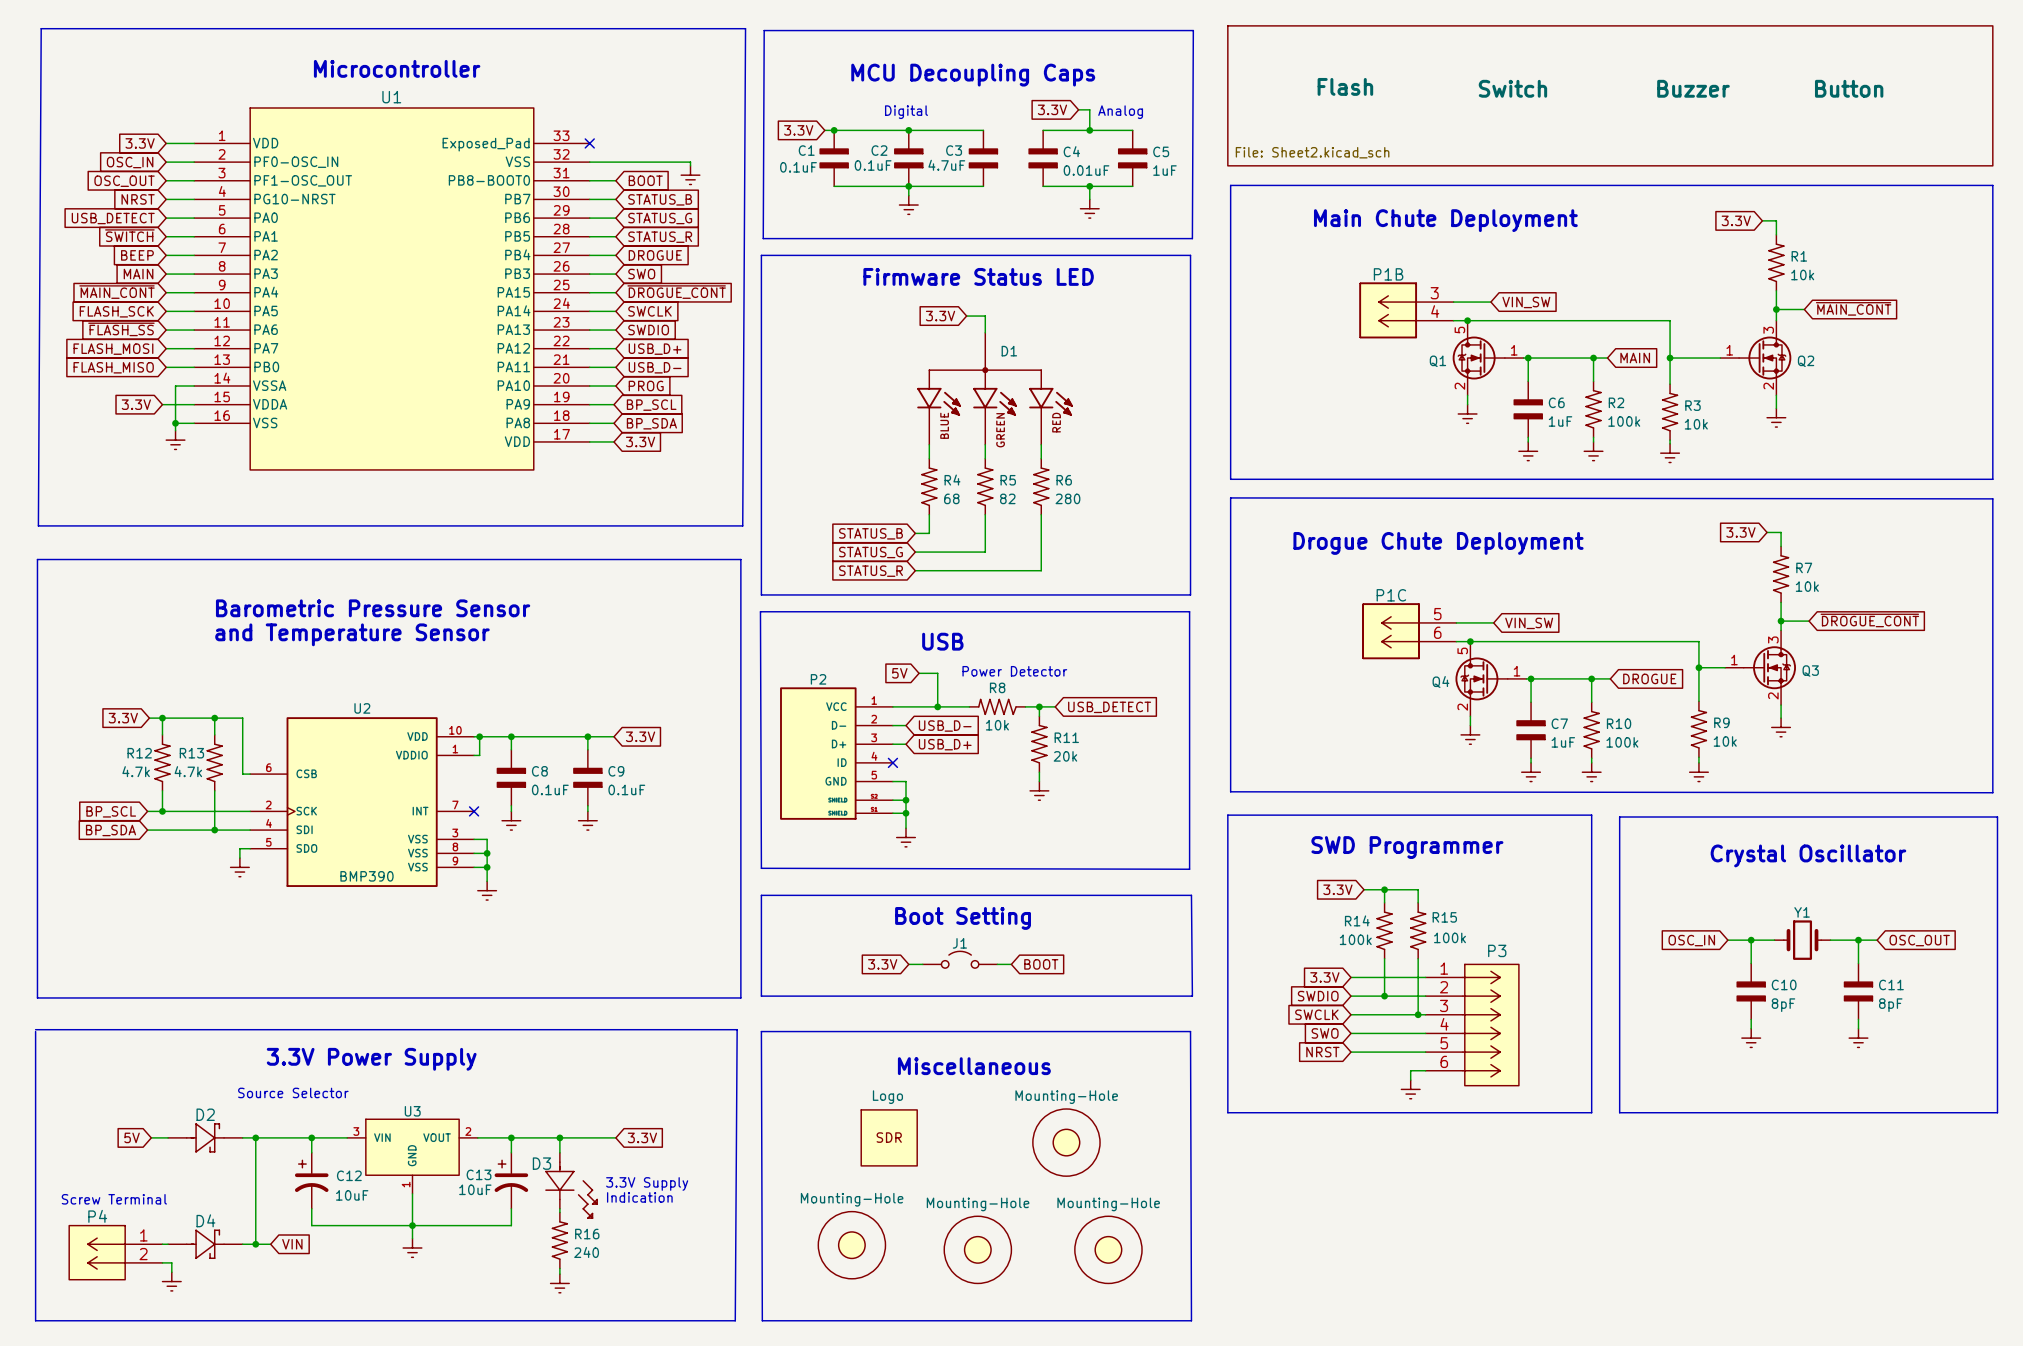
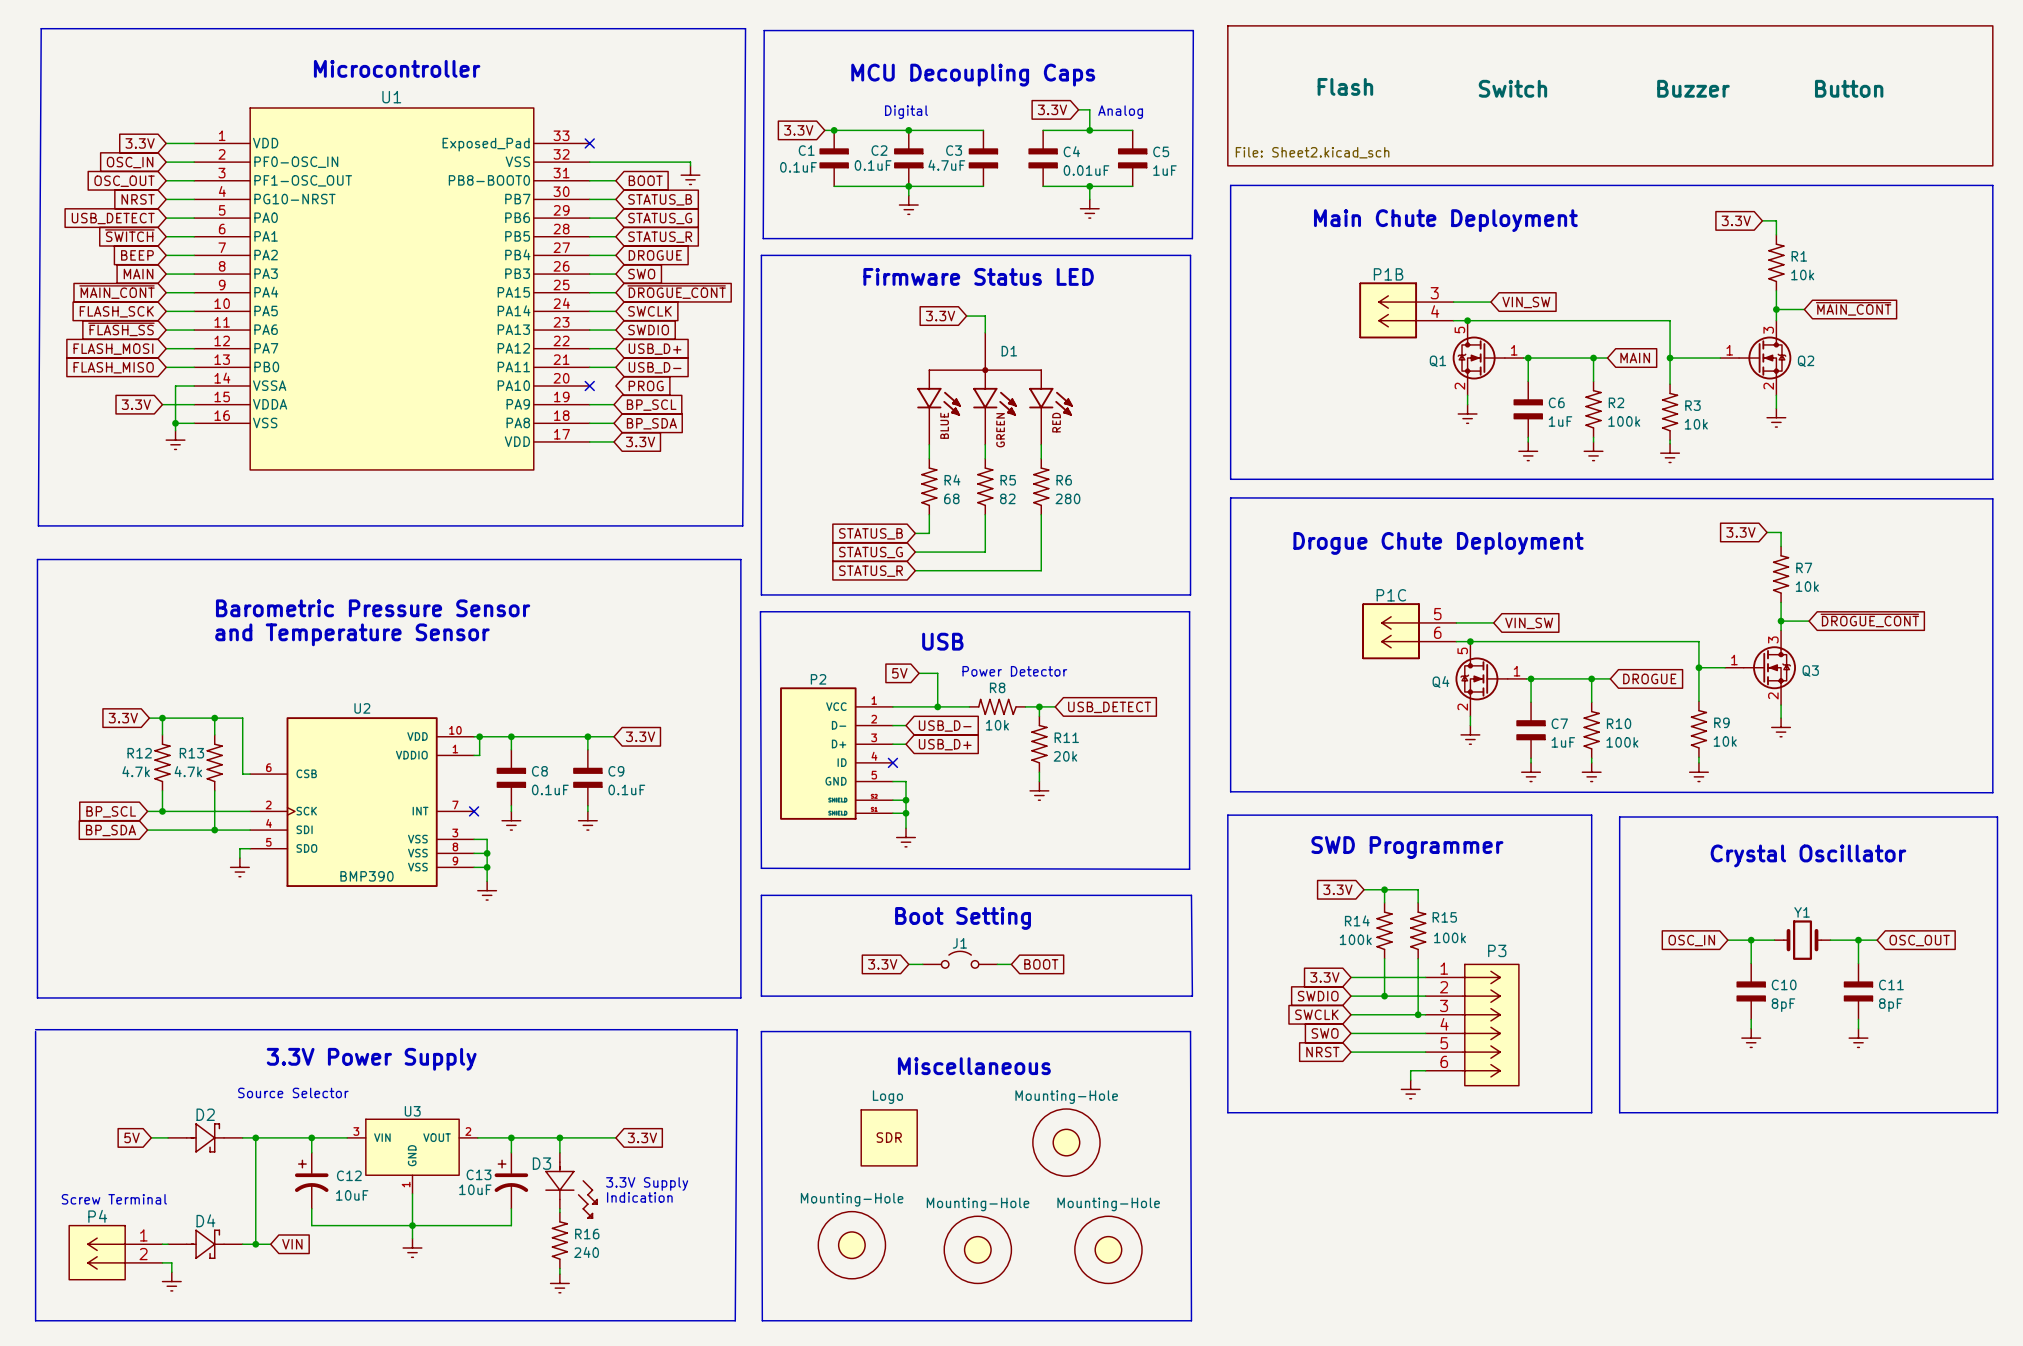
wire: (589, 386) (615, 386) -> none
no-connect mark: none -> (589, 386)

